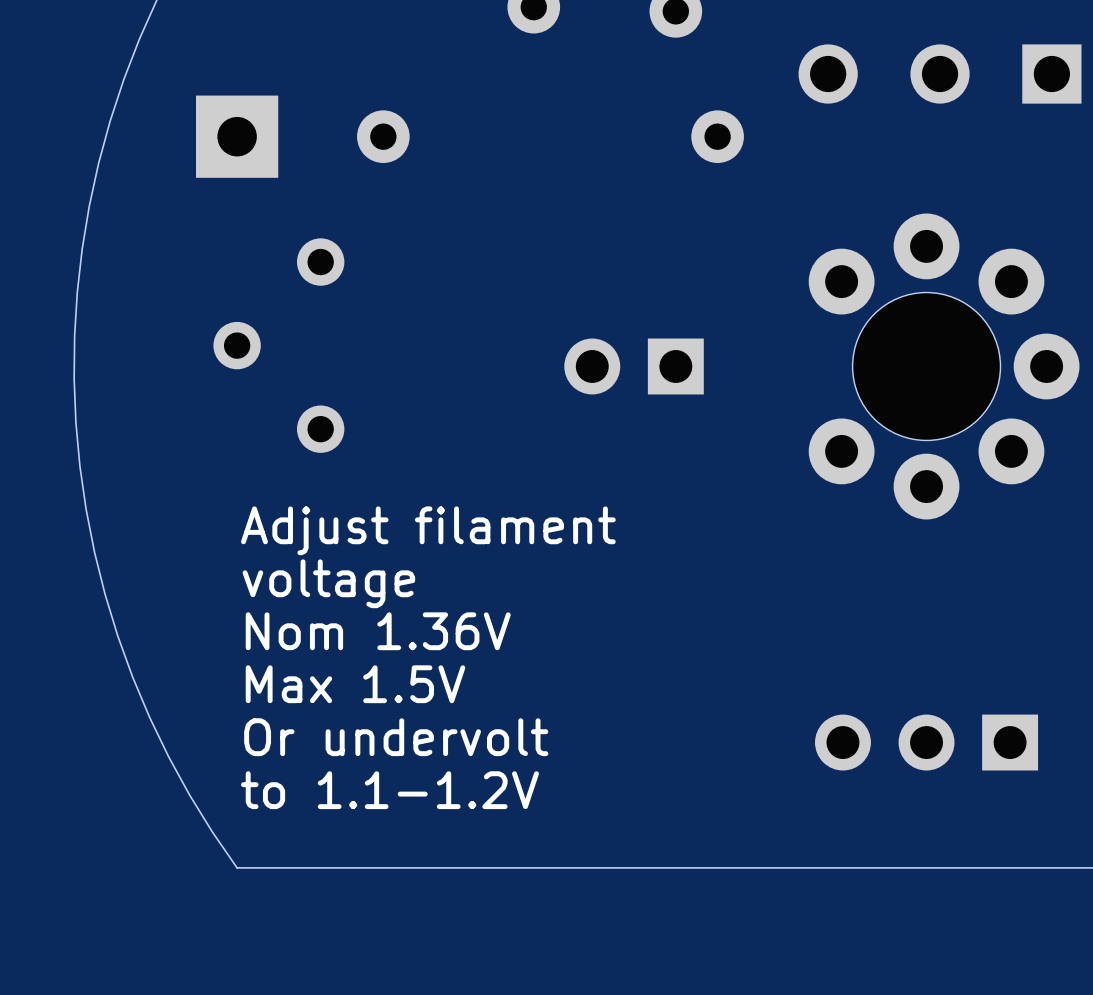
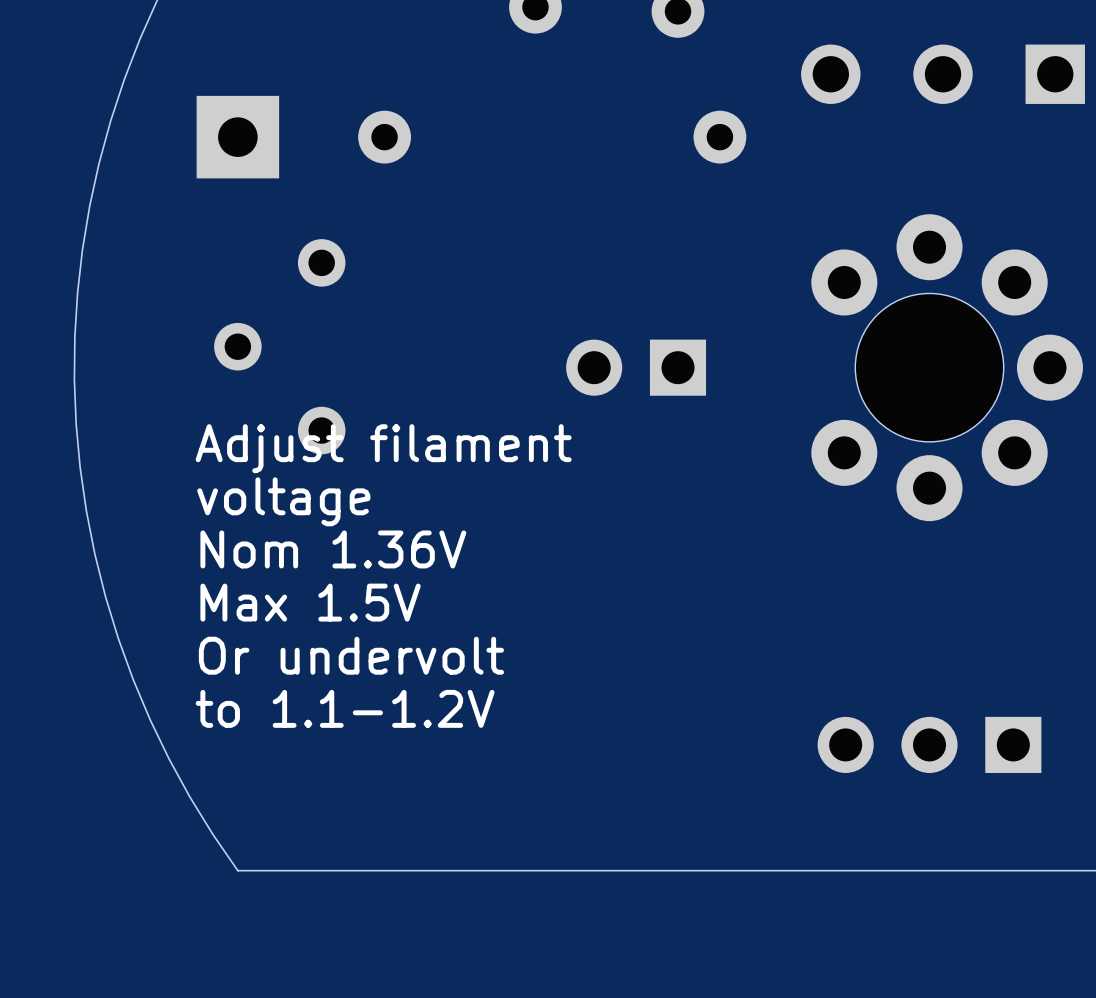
text position: Adjust filament (428, 530) -> Adjust filament (383, 448)
text position: voltage (328, 583) -> voltage (283, 501)
text position: Nom 1.36V (378, 631) -> Nom 1.36V (333, 549)
text position: Max 1.5V (355, 684) -> Max 1.5V (310, 602)
text position: Or undervolt (396, 737) -> Or undervolt (351, 655)
text position: to 1.1-1.2V (389, 790) -> to 1.1-1.2V (345, 708)

